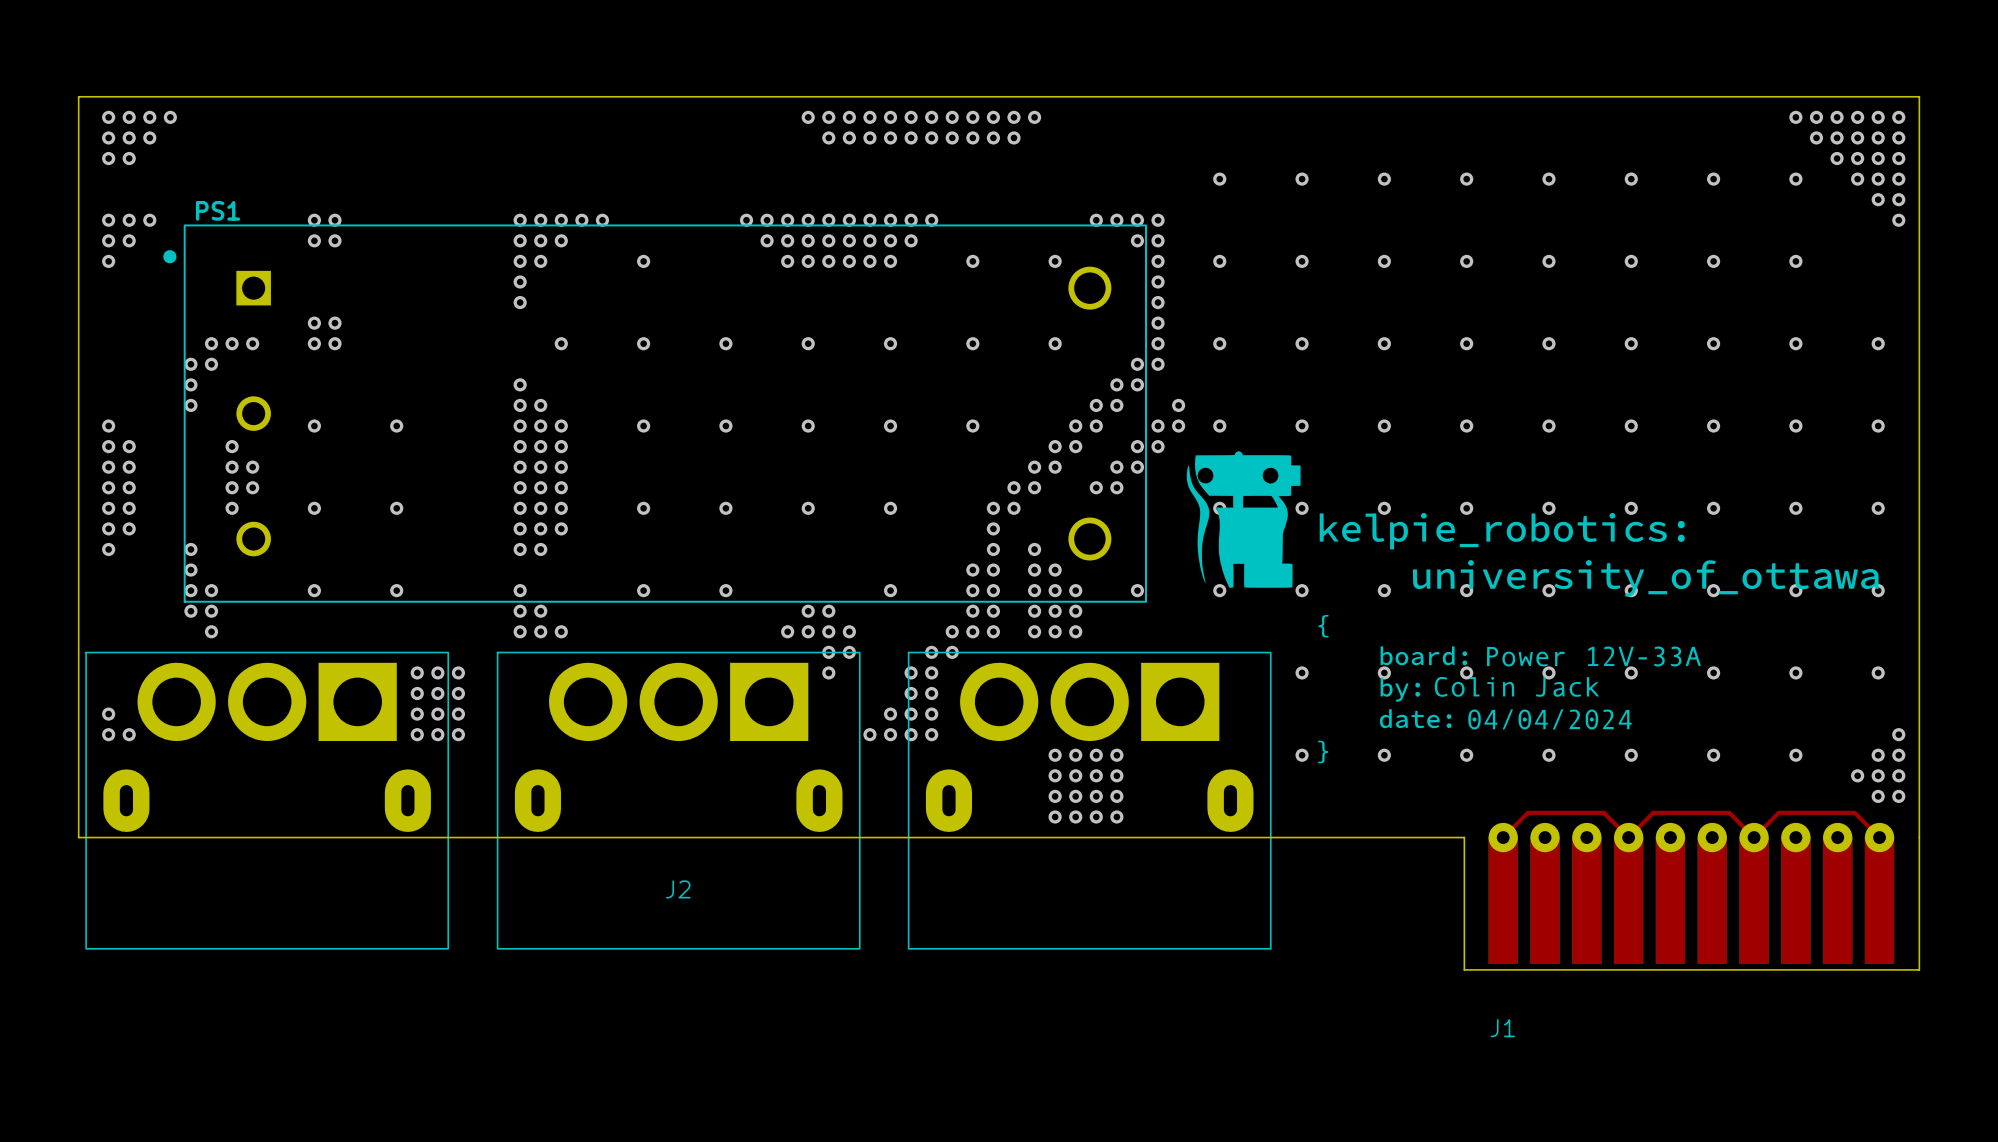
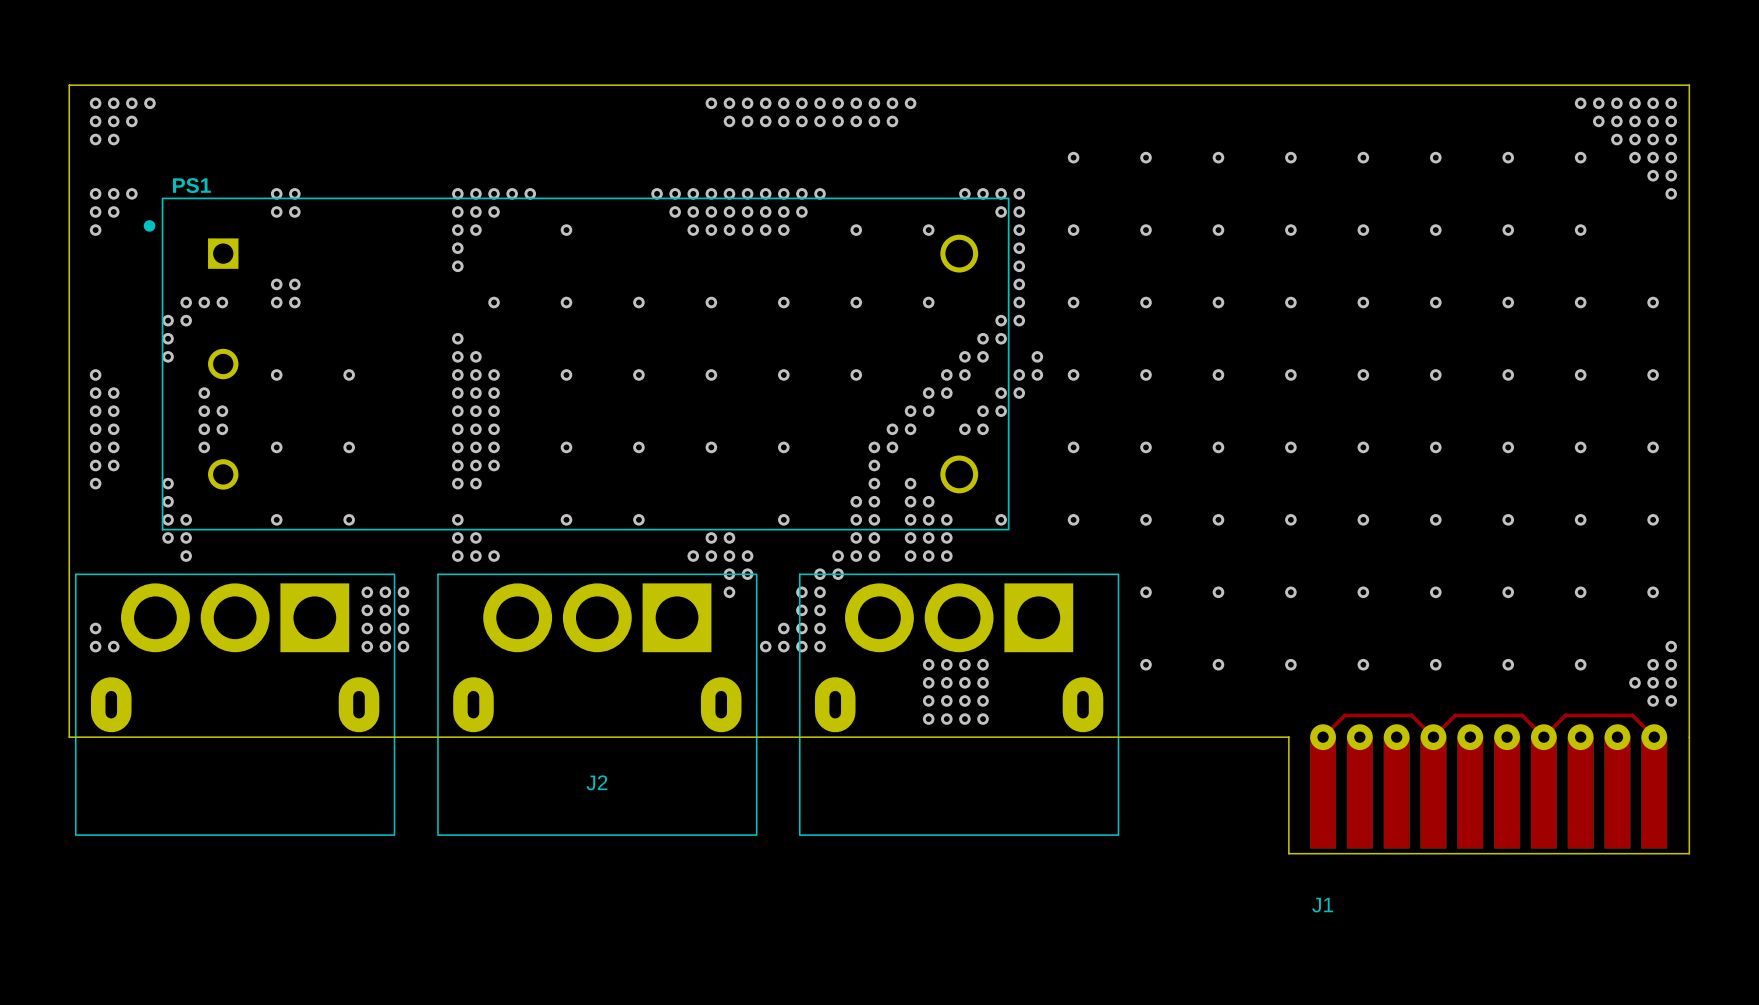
drawing: [1186, 451, 1879, 764] -> none

